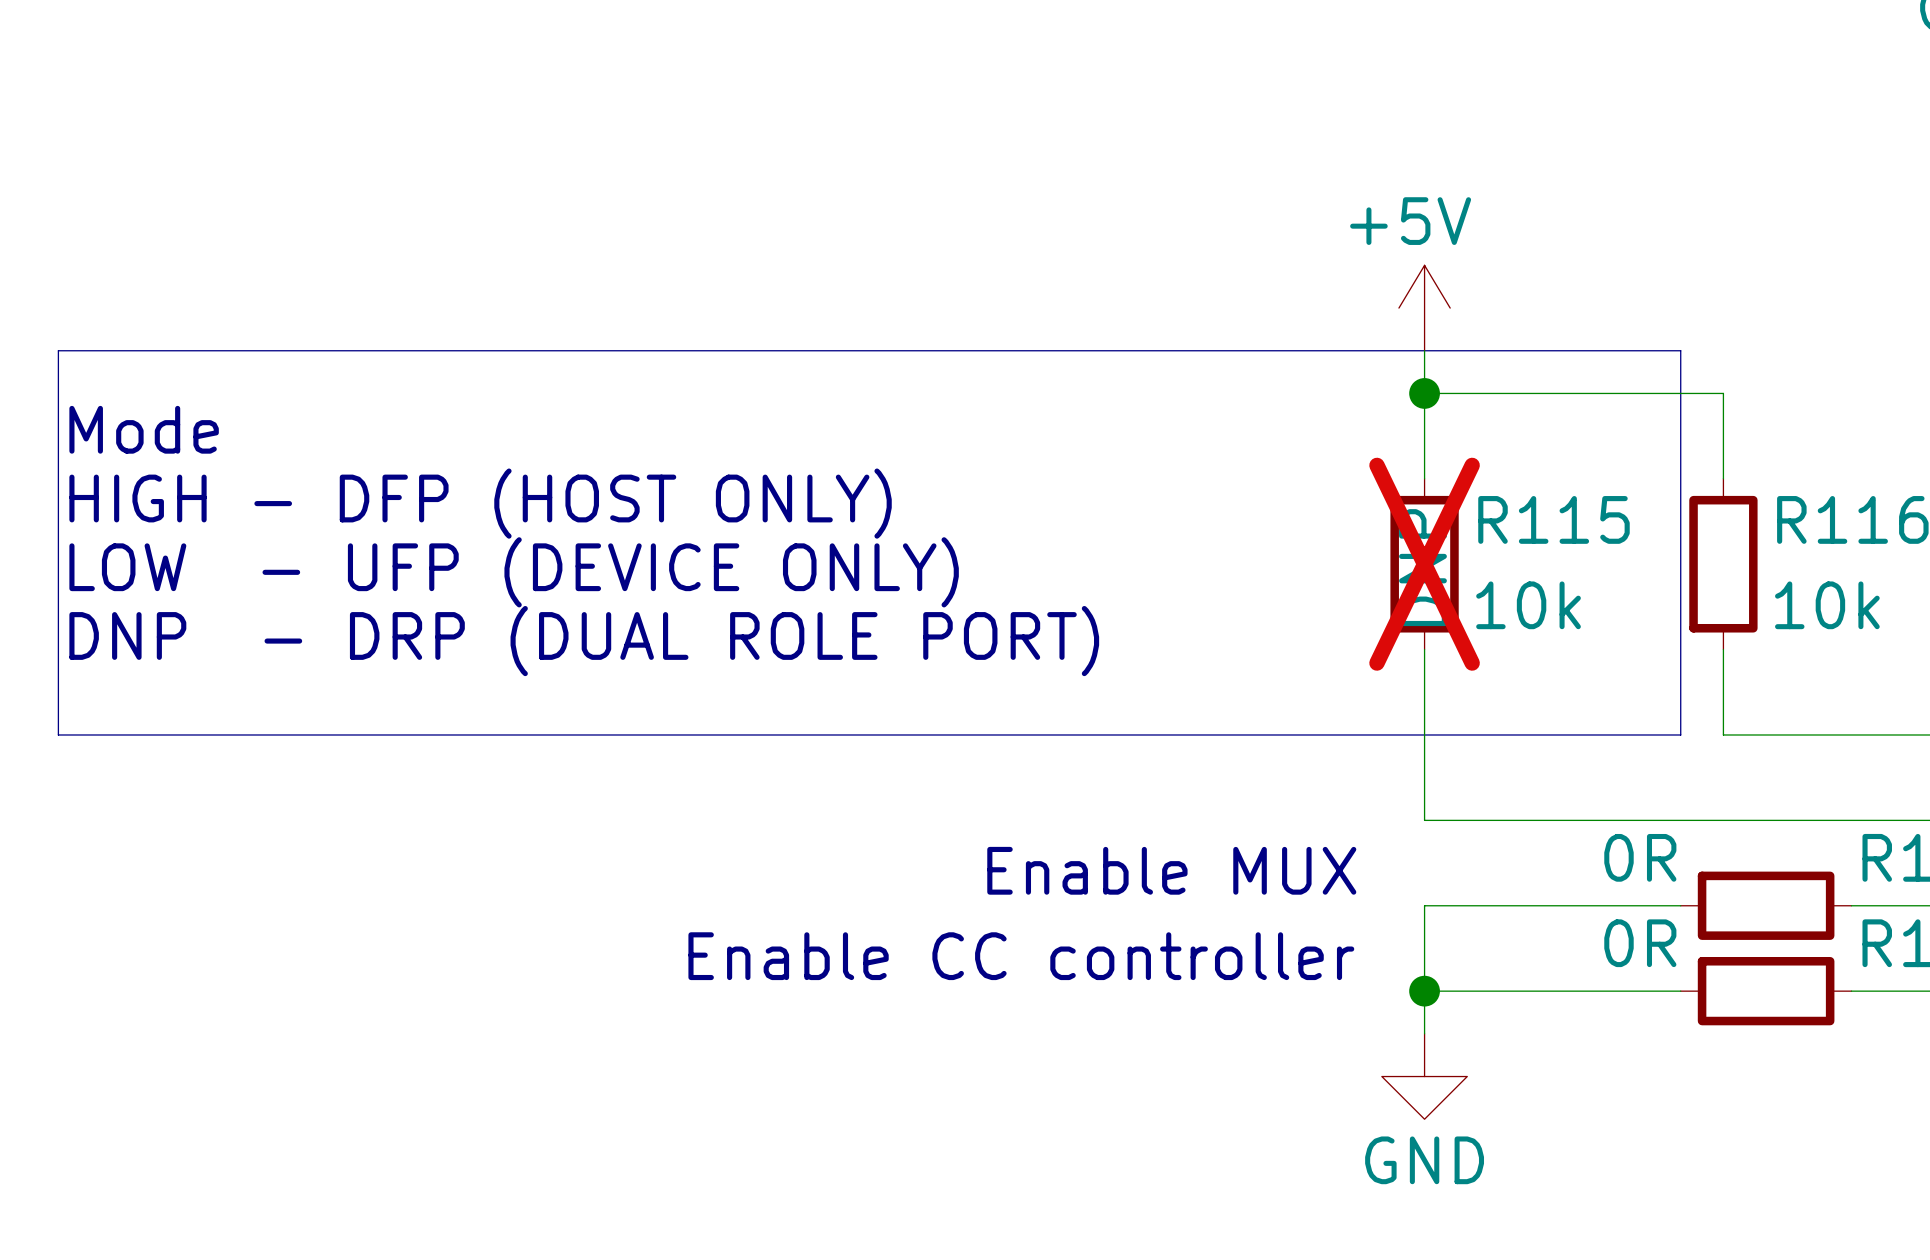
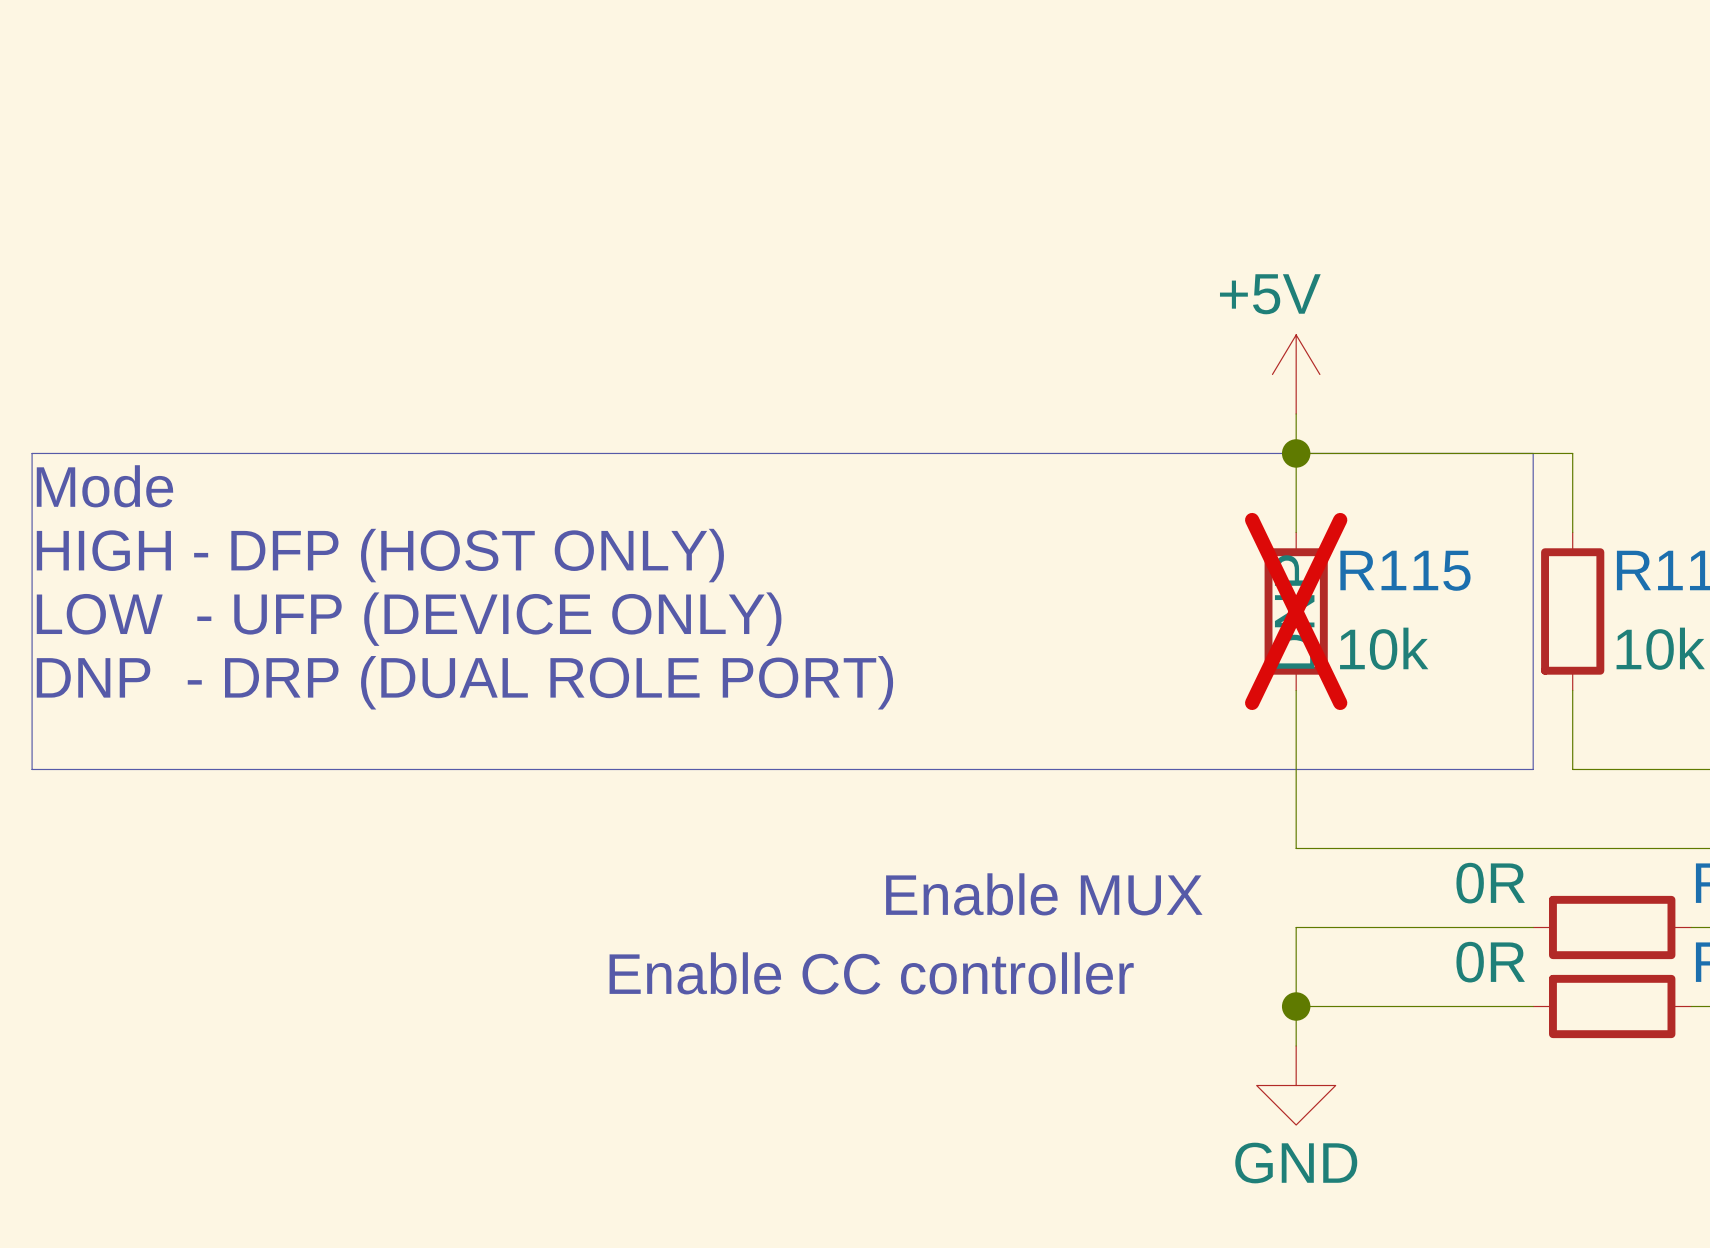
line: (58, 393) (58, 350) (1680, 350) (1680, 393) -> (32, 453) (1533, 453)

